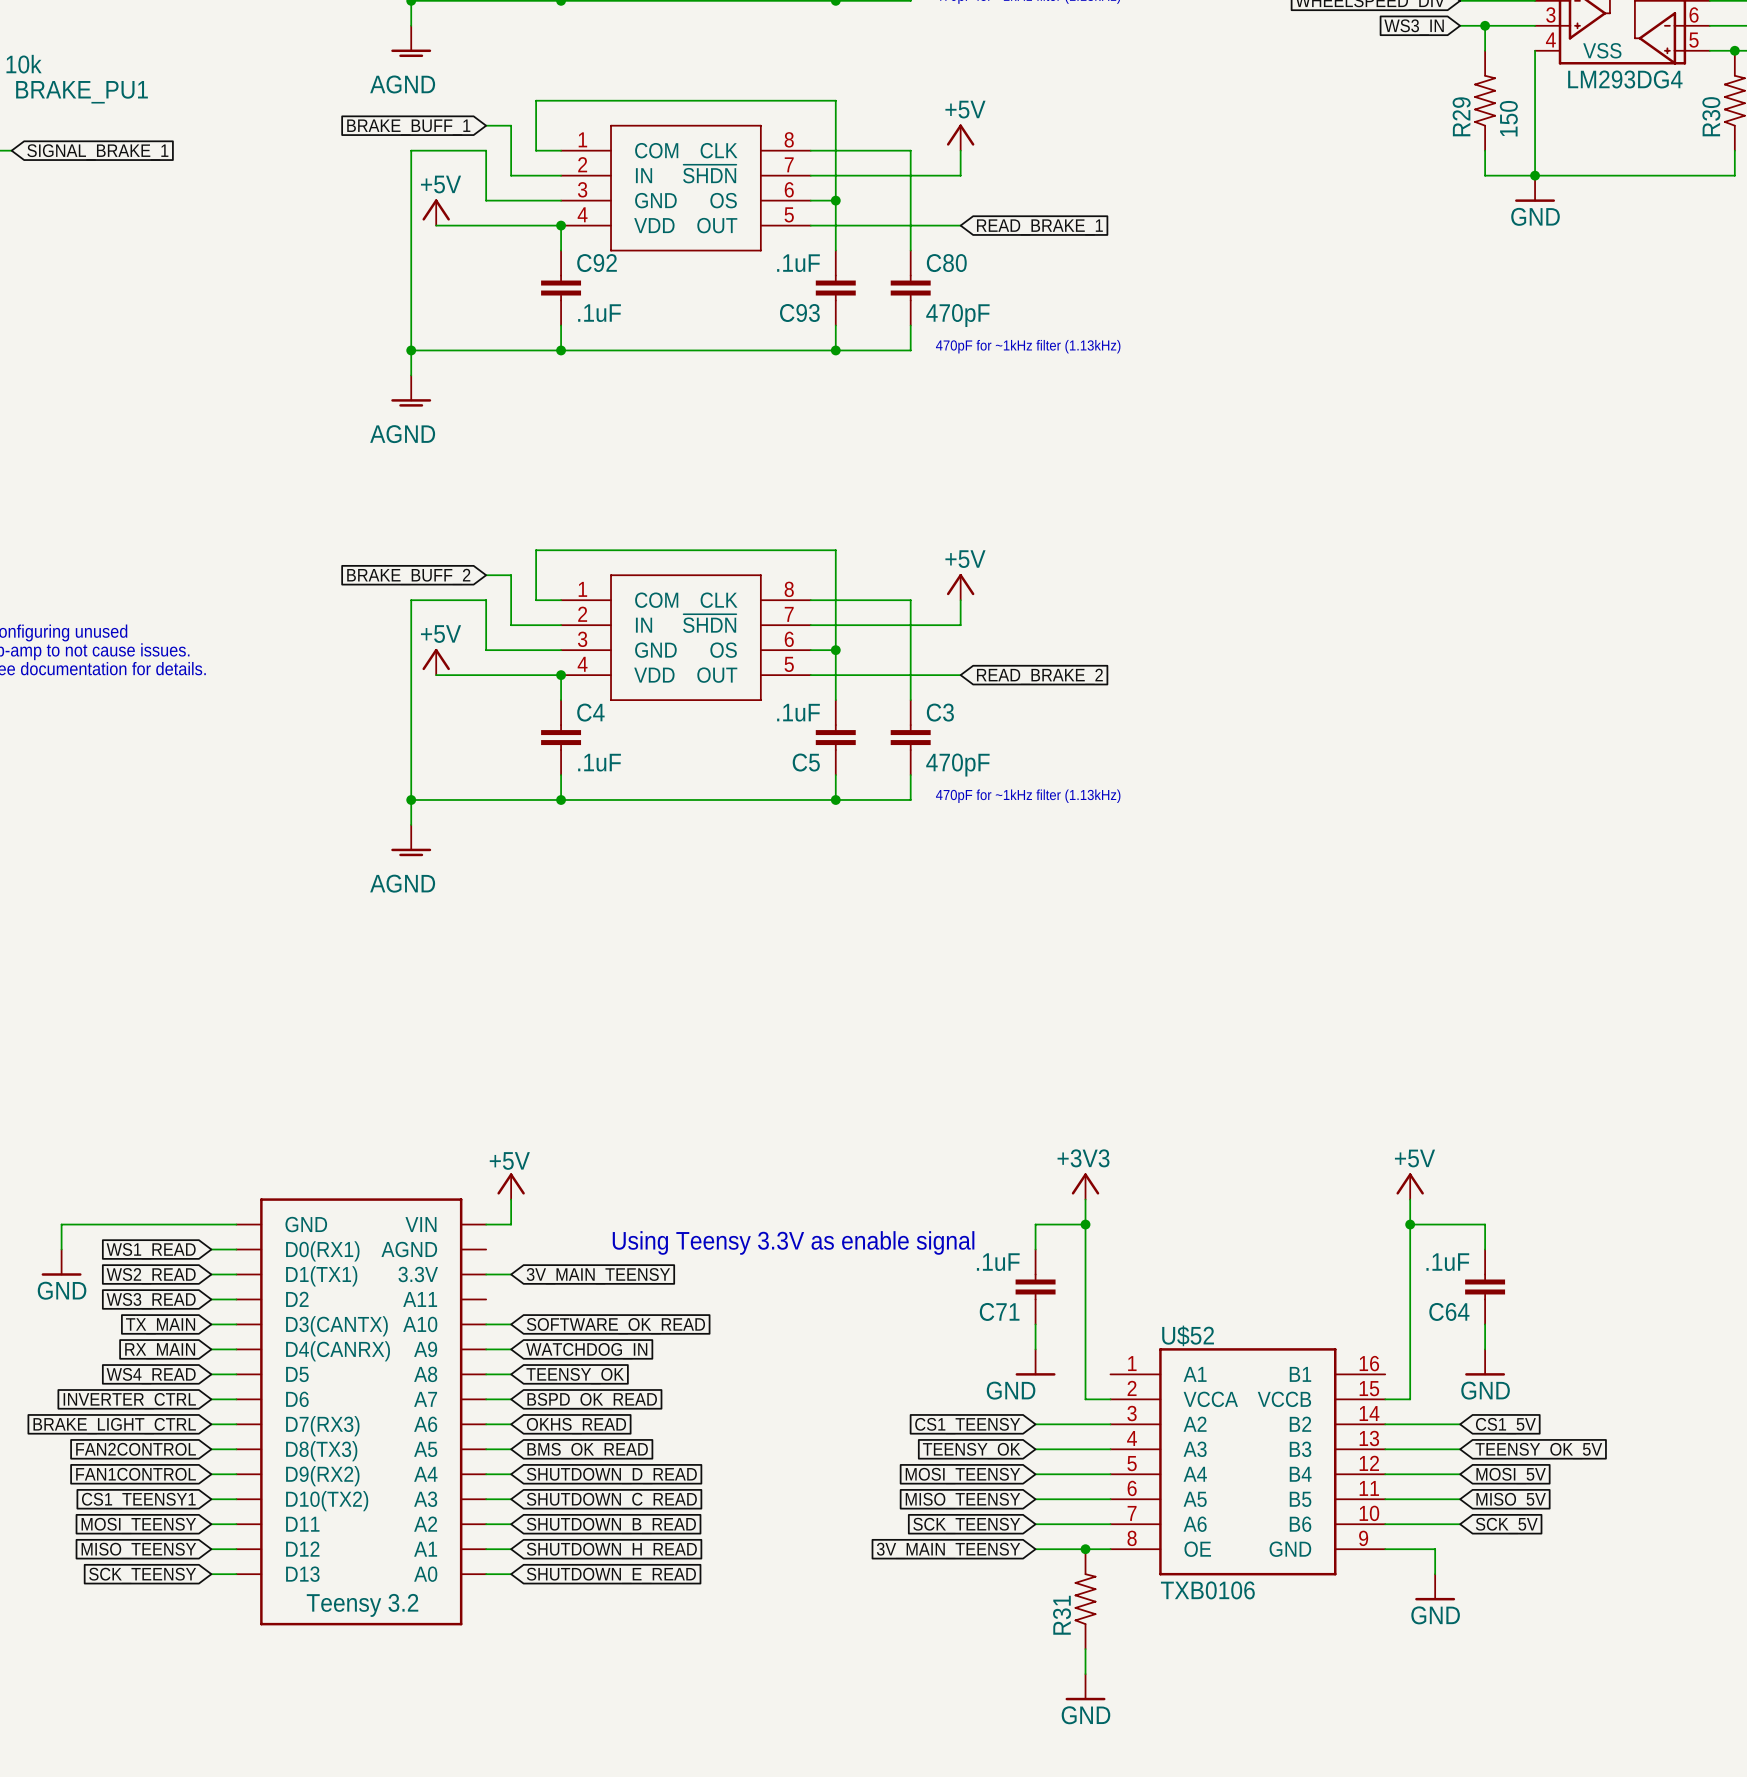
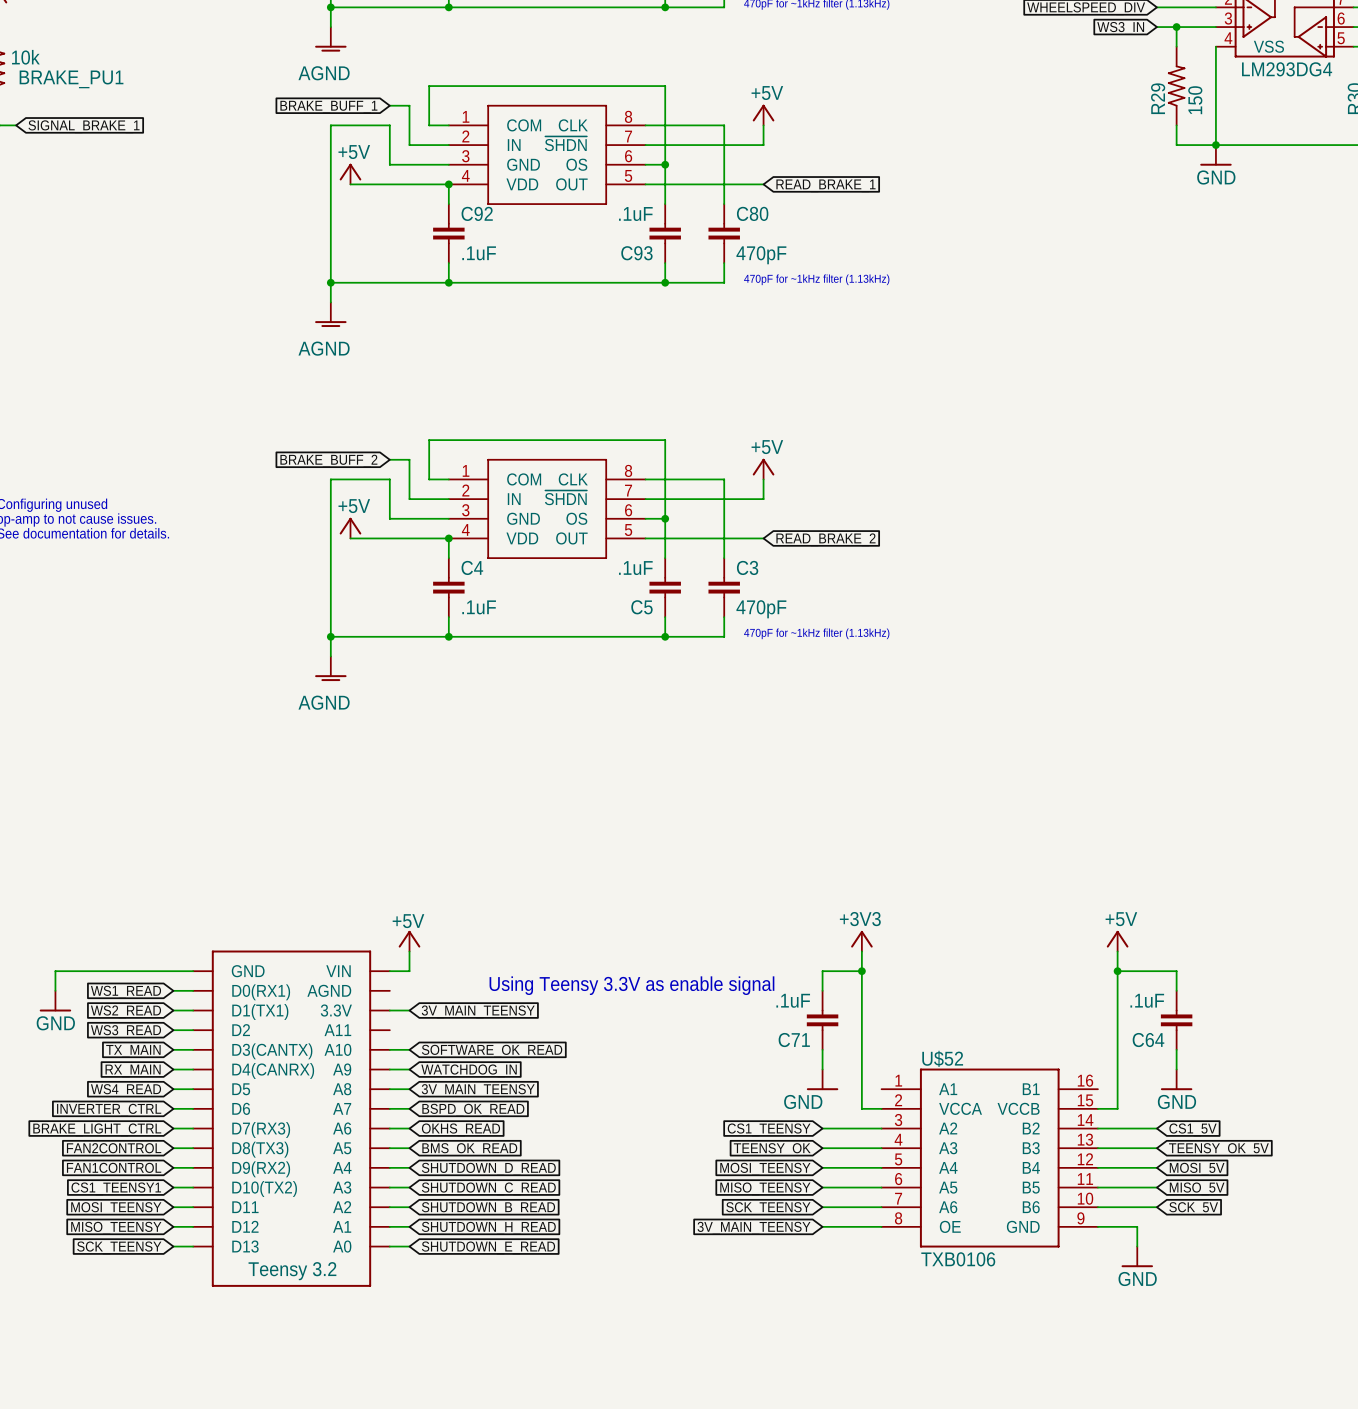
global label: TEENSY_OK (575, 1376) -> 3V_MAIN_TEENSY (478, 1090)
junction: (1085, 1549) -> none
R31: (1085, 1599) -> none
wire: (1085, 1649) (1085, 1674) -> none
power symbol: GND (1085, 1687) -> none

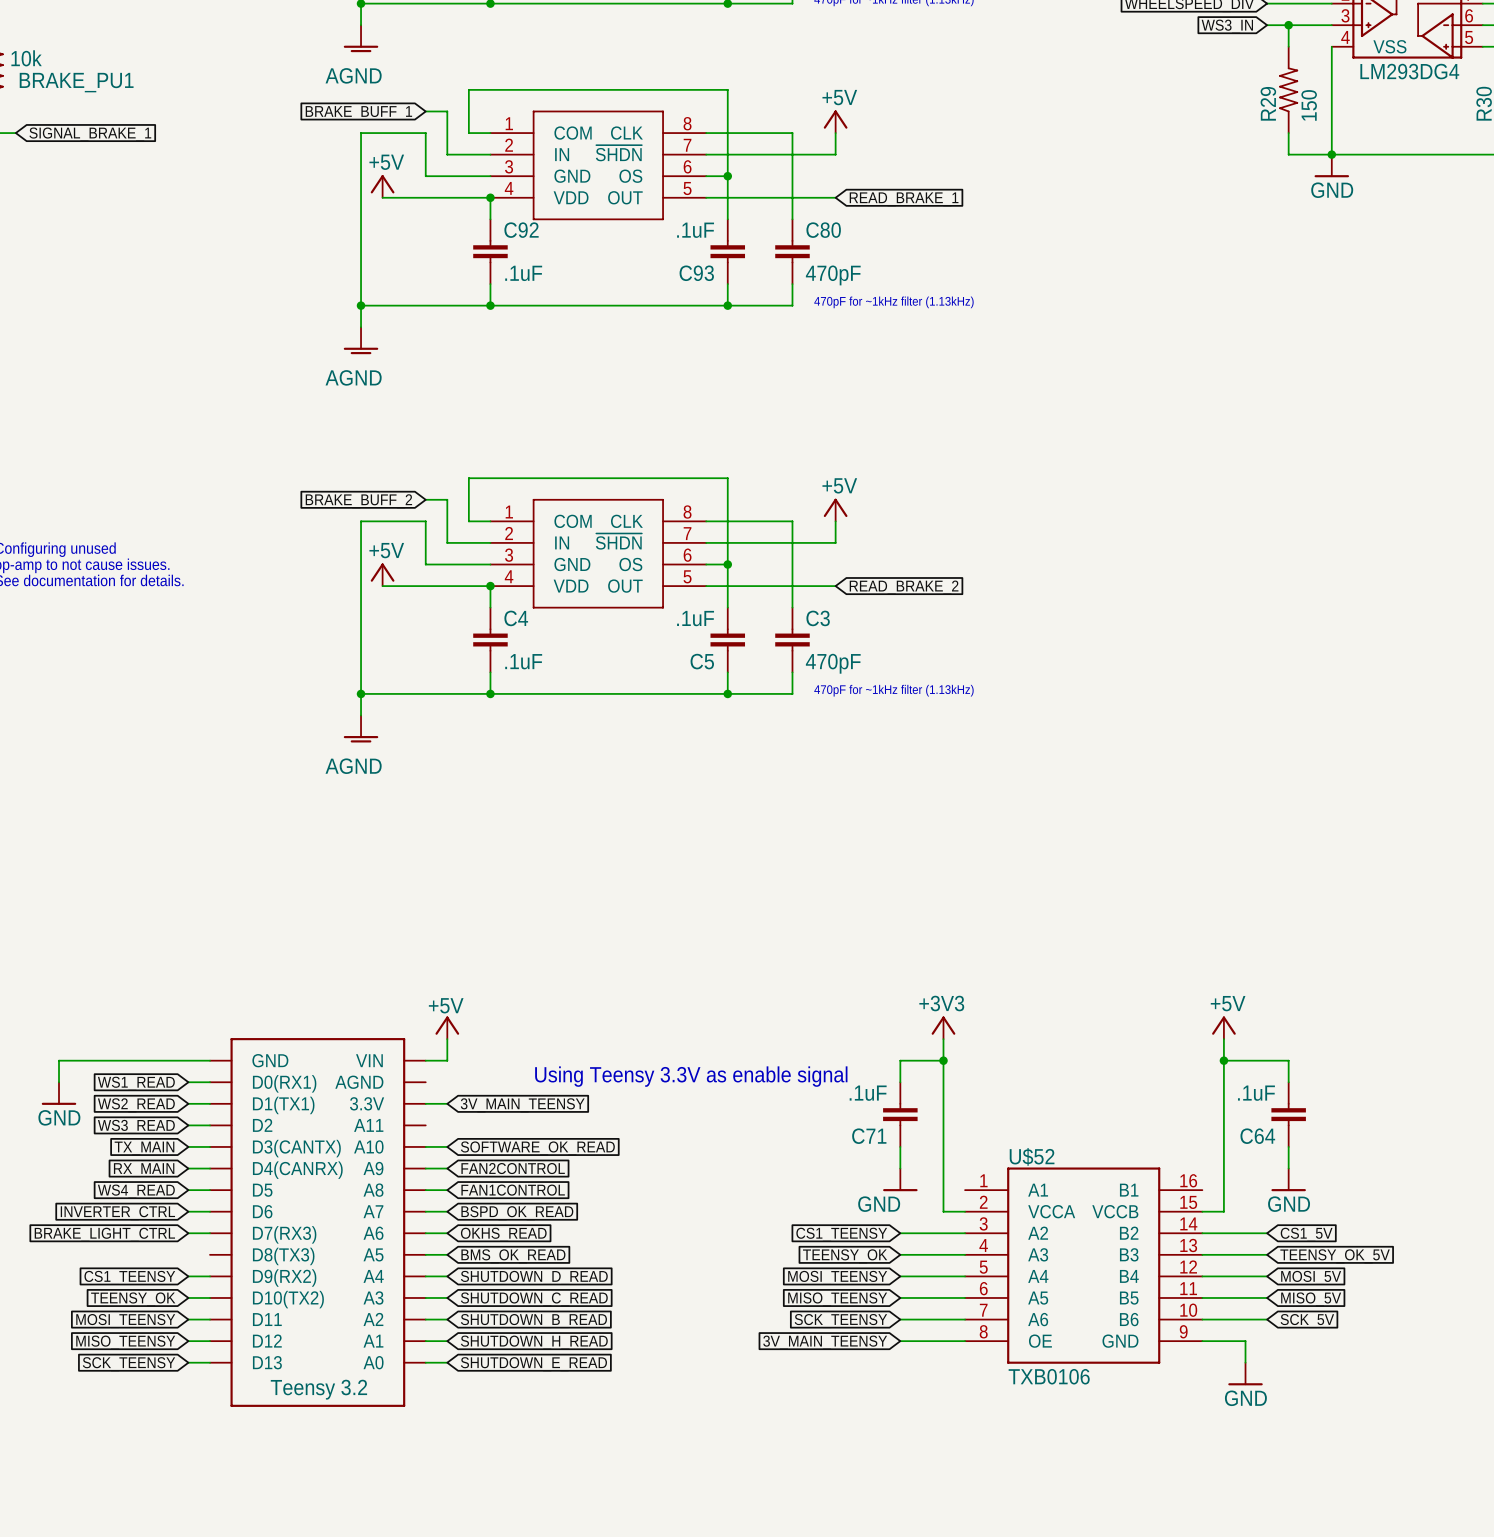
global label: WATCHDOG_IN (469, 1070) -> FAN2CONTROL (513, 1168)
global label: 3V_MAIN_TEENSY (478, 1090) -> FAN1CONTROL (513, 1190)
global label: FAN2CONTROL (114, 1148) -> none
wire: (173, 1148) (193, 1148) -> none
global label: FAN1CONTROL (114, 1167) -> CS1_TEENSY (129, 1277)
global label: CS1_TEENSY1 (116, 1188) -> TEENSY_OK (133, 1299)

